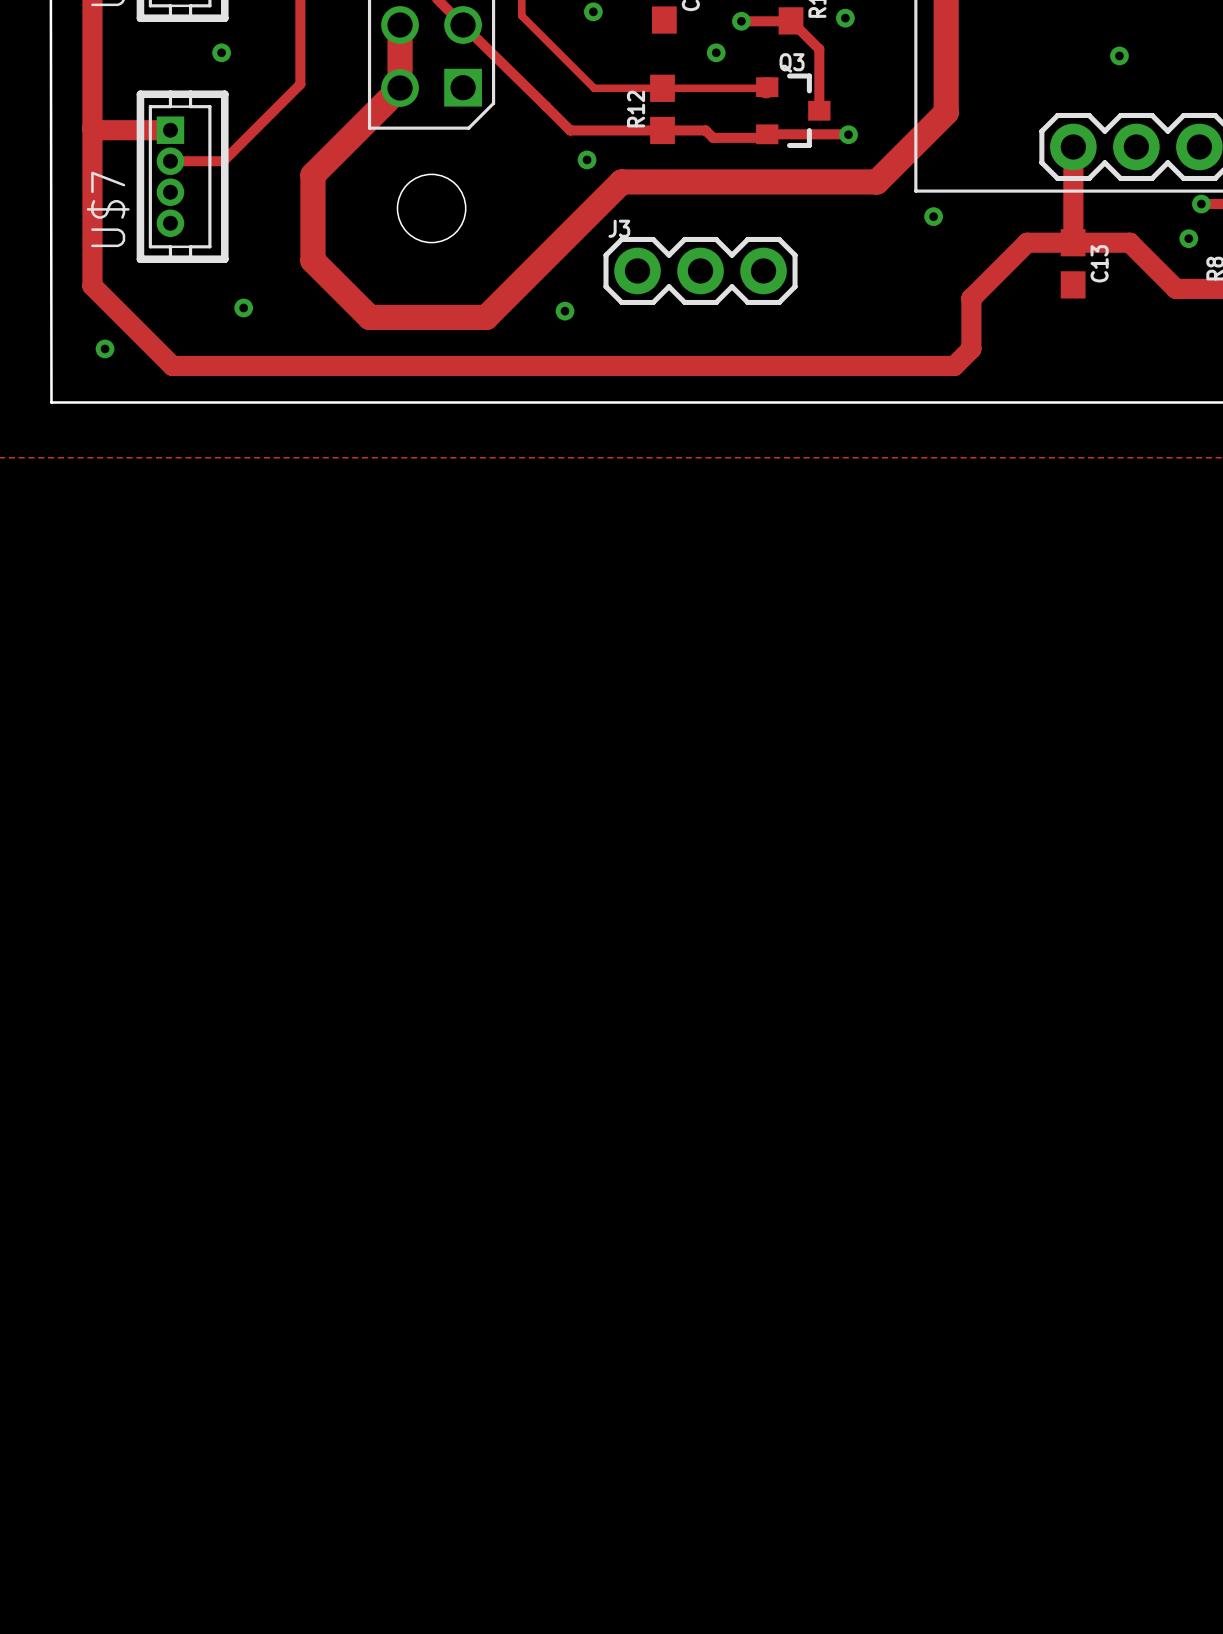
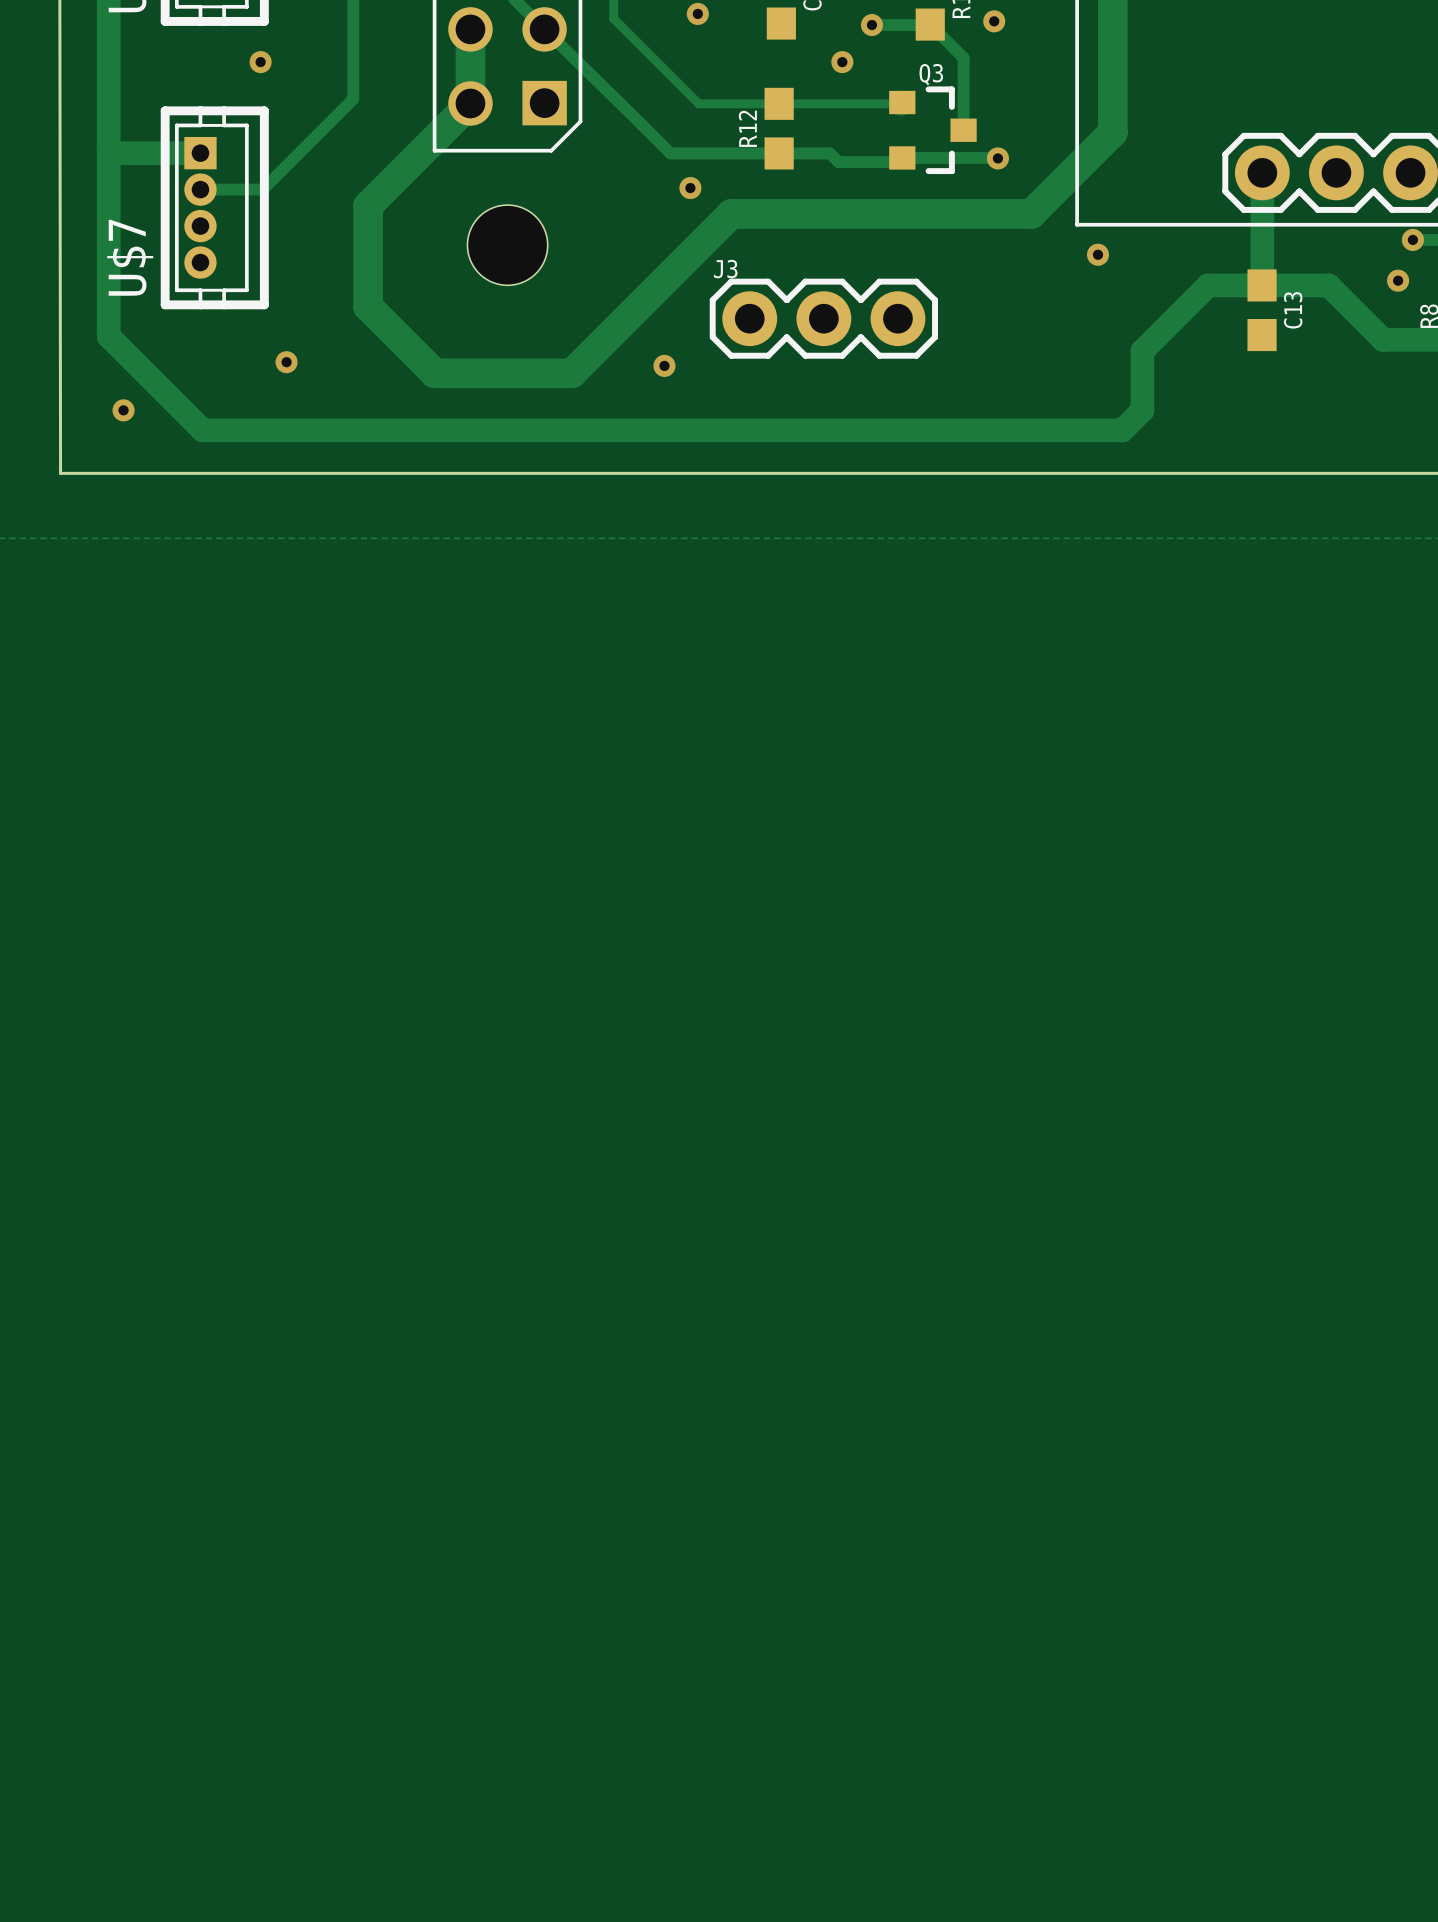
via: (1119, 55) -> none

